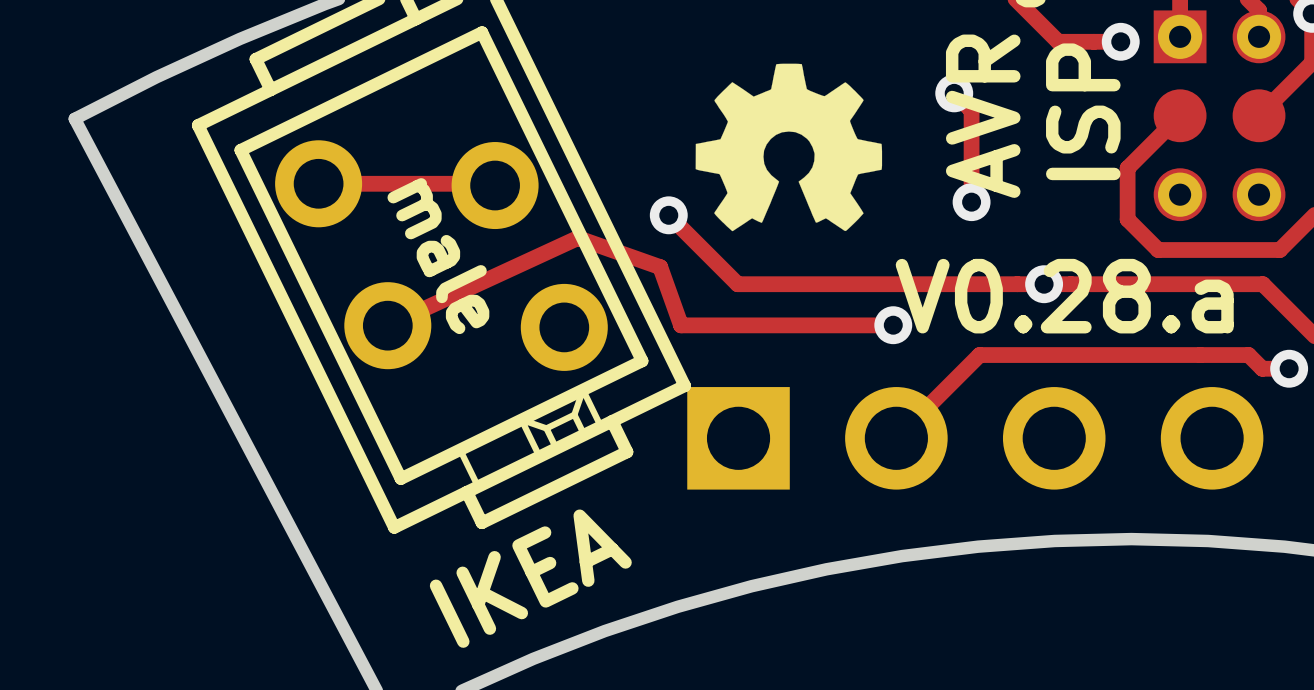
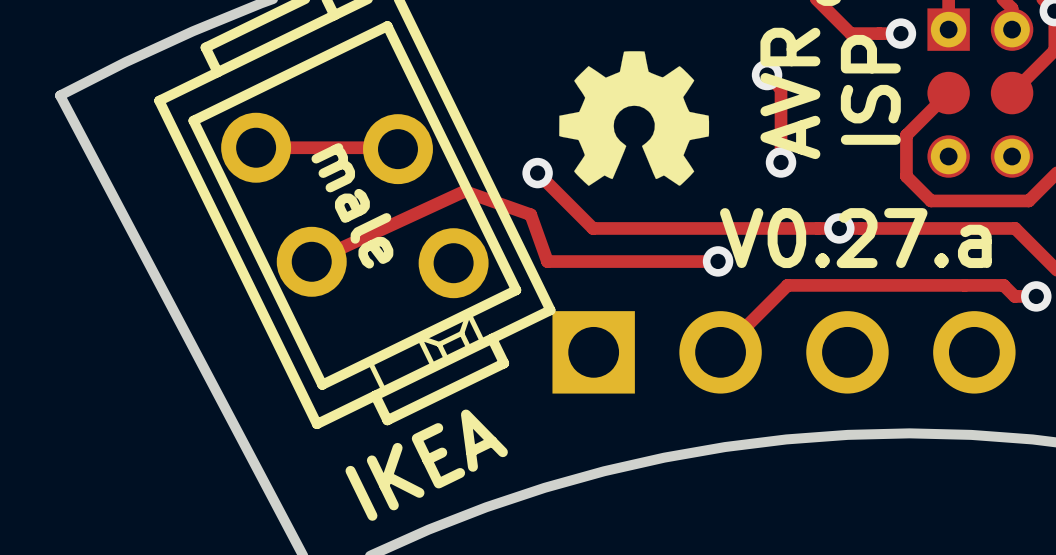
text: V0.28.a (1064, 296) -> V0.27.a (855, 238)

